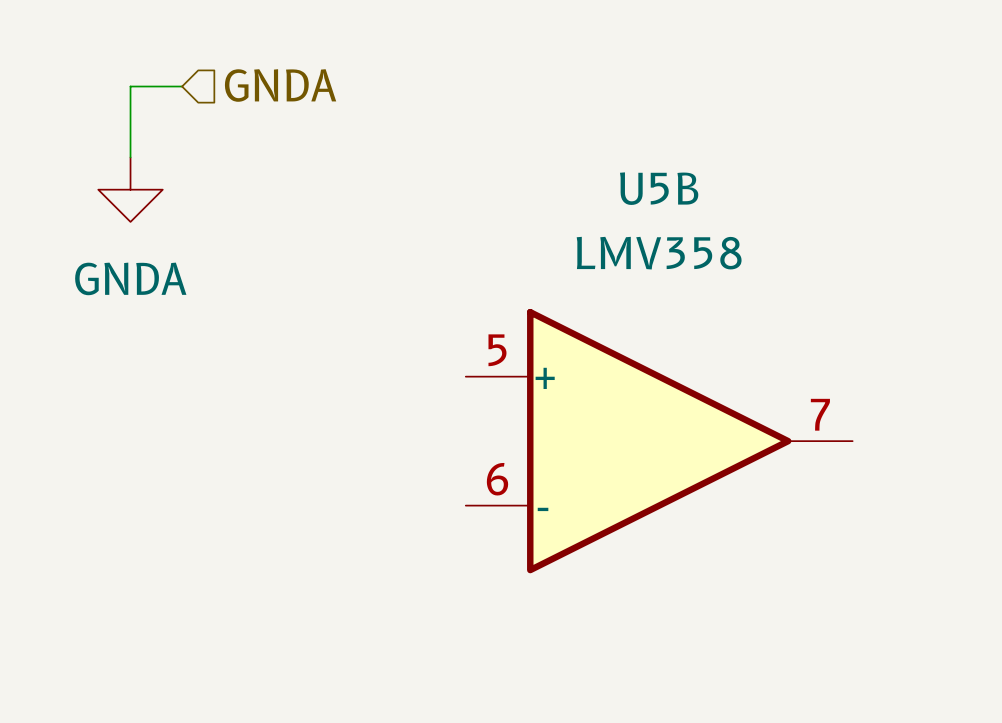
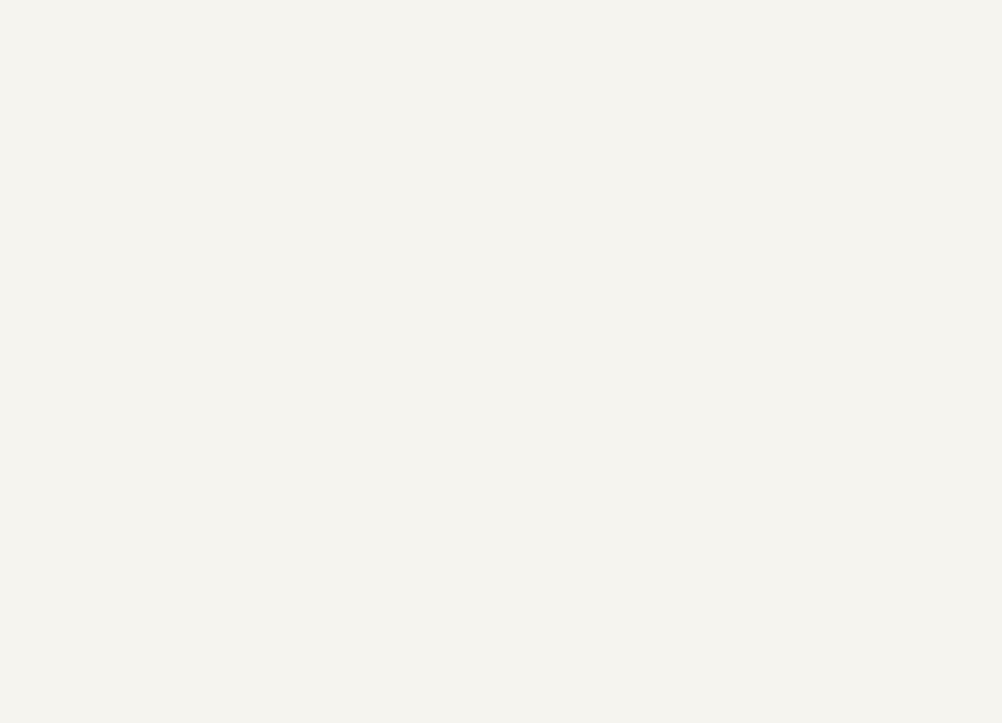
hierarchical label: GNDA (280, 85) -> none
wire: (182, 86) (130, 86) (130, 157) -> none
power symbol: GNDA (130, 189) -> none
U5B: LMV358 (659, 441) -> none

